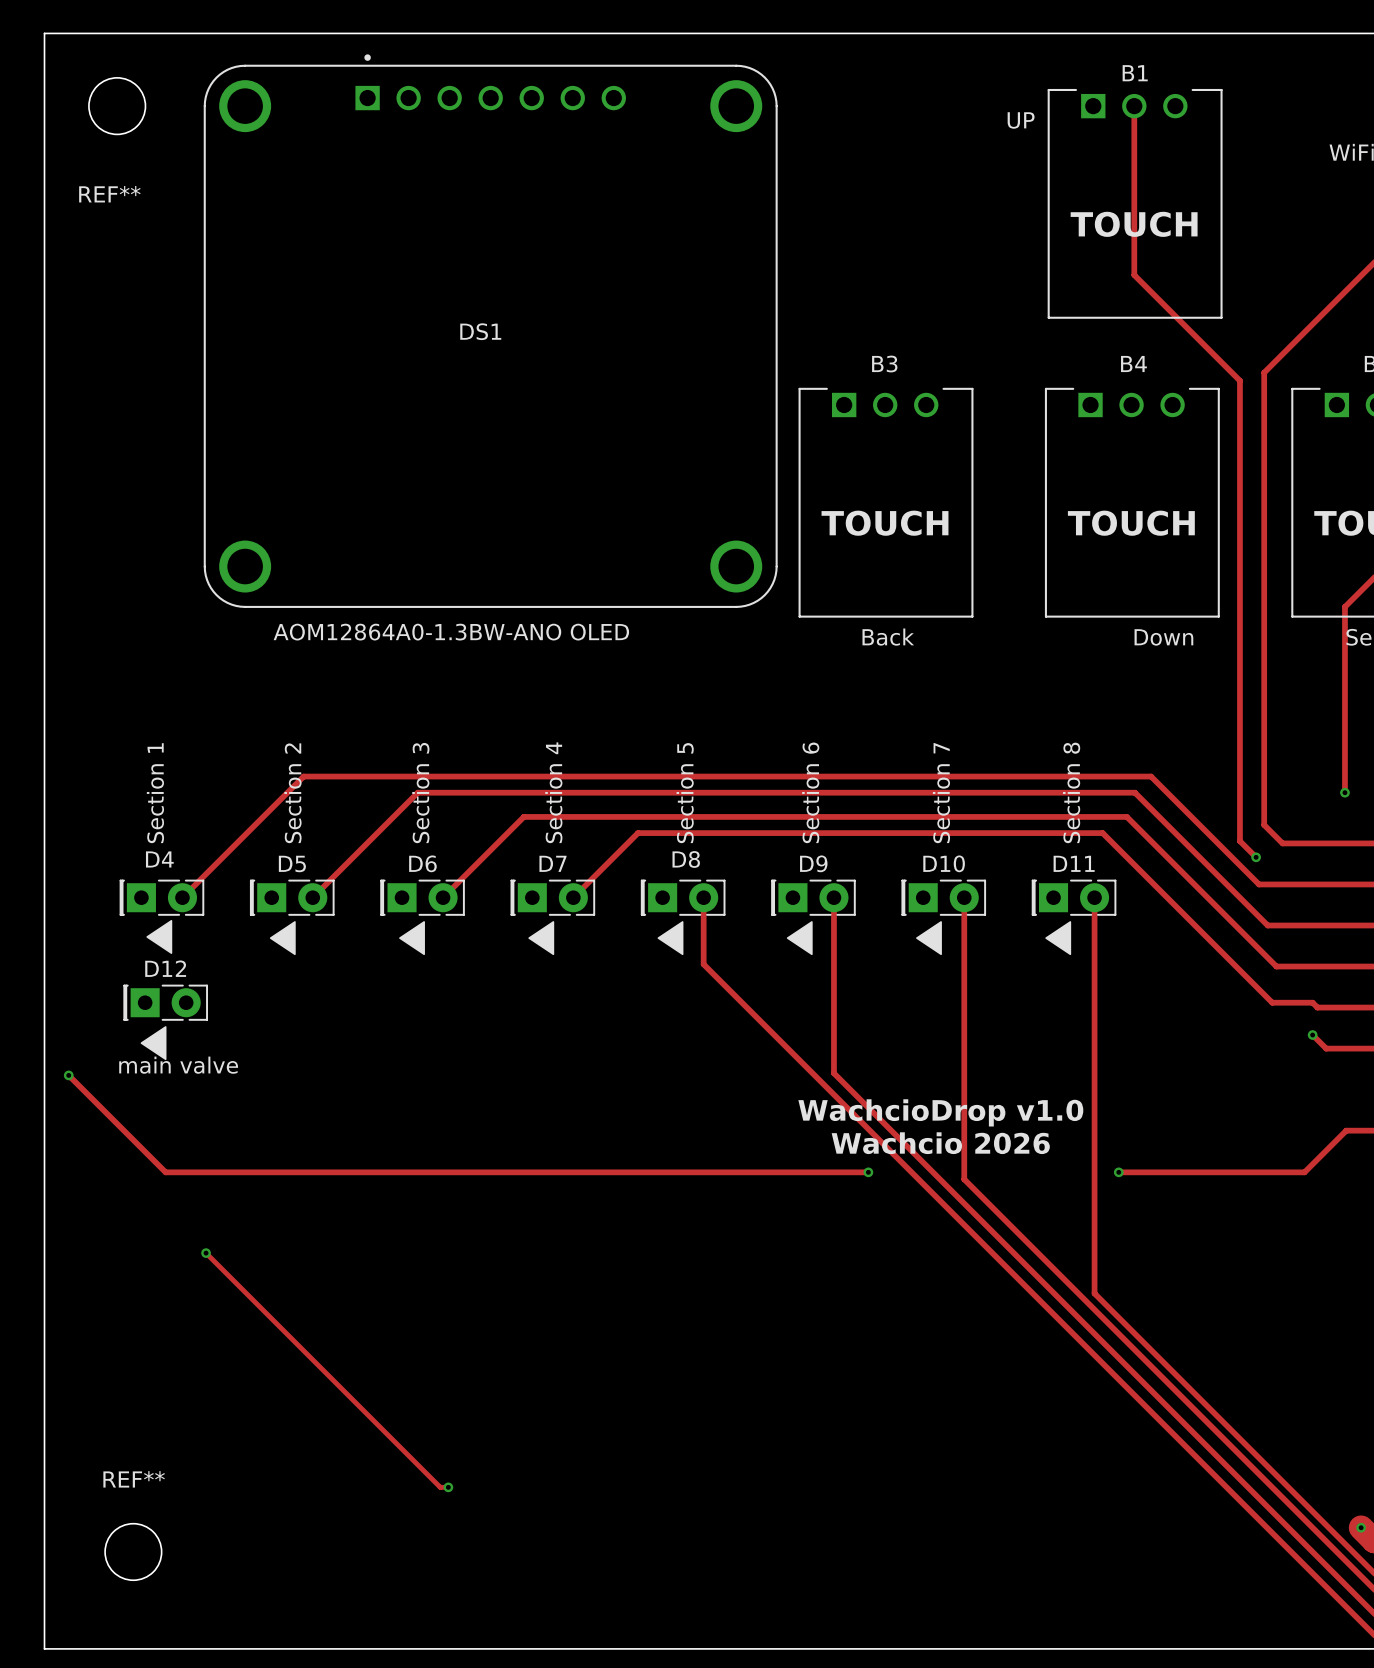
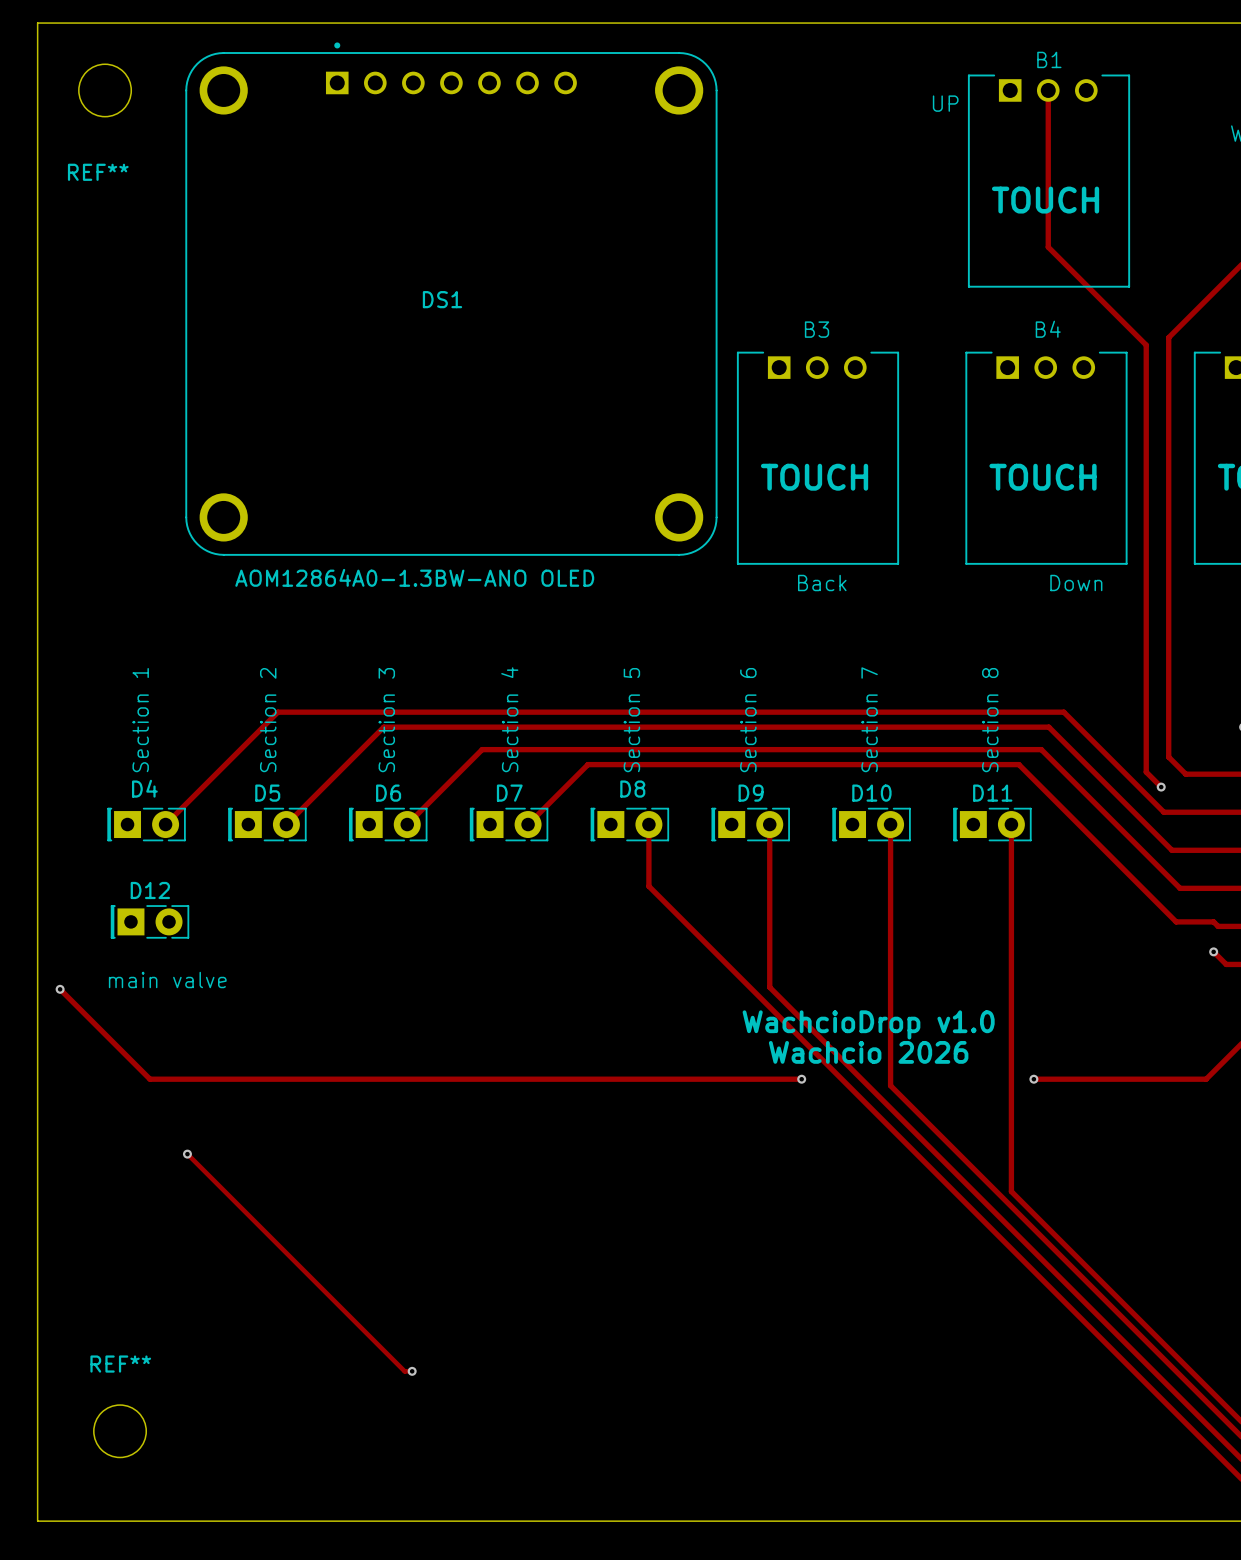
drawing: [146, 919, 173, 954] -> none
drawing: [269, 921, 296, 956] -> none
drawing: [399, 921, 425, 956] -> none
drawing: [528, 921, 555, 956] -> none
drawing: [657, 921, 684, 956] -> none
drawing: [786, 921, 813, 956] -> none
drawing: [916, 921, 942, 956] -> none
drawing: [1045, 921, 1072, 956] -> none
drawing: [140, 1026, 167, 1061] -> none

